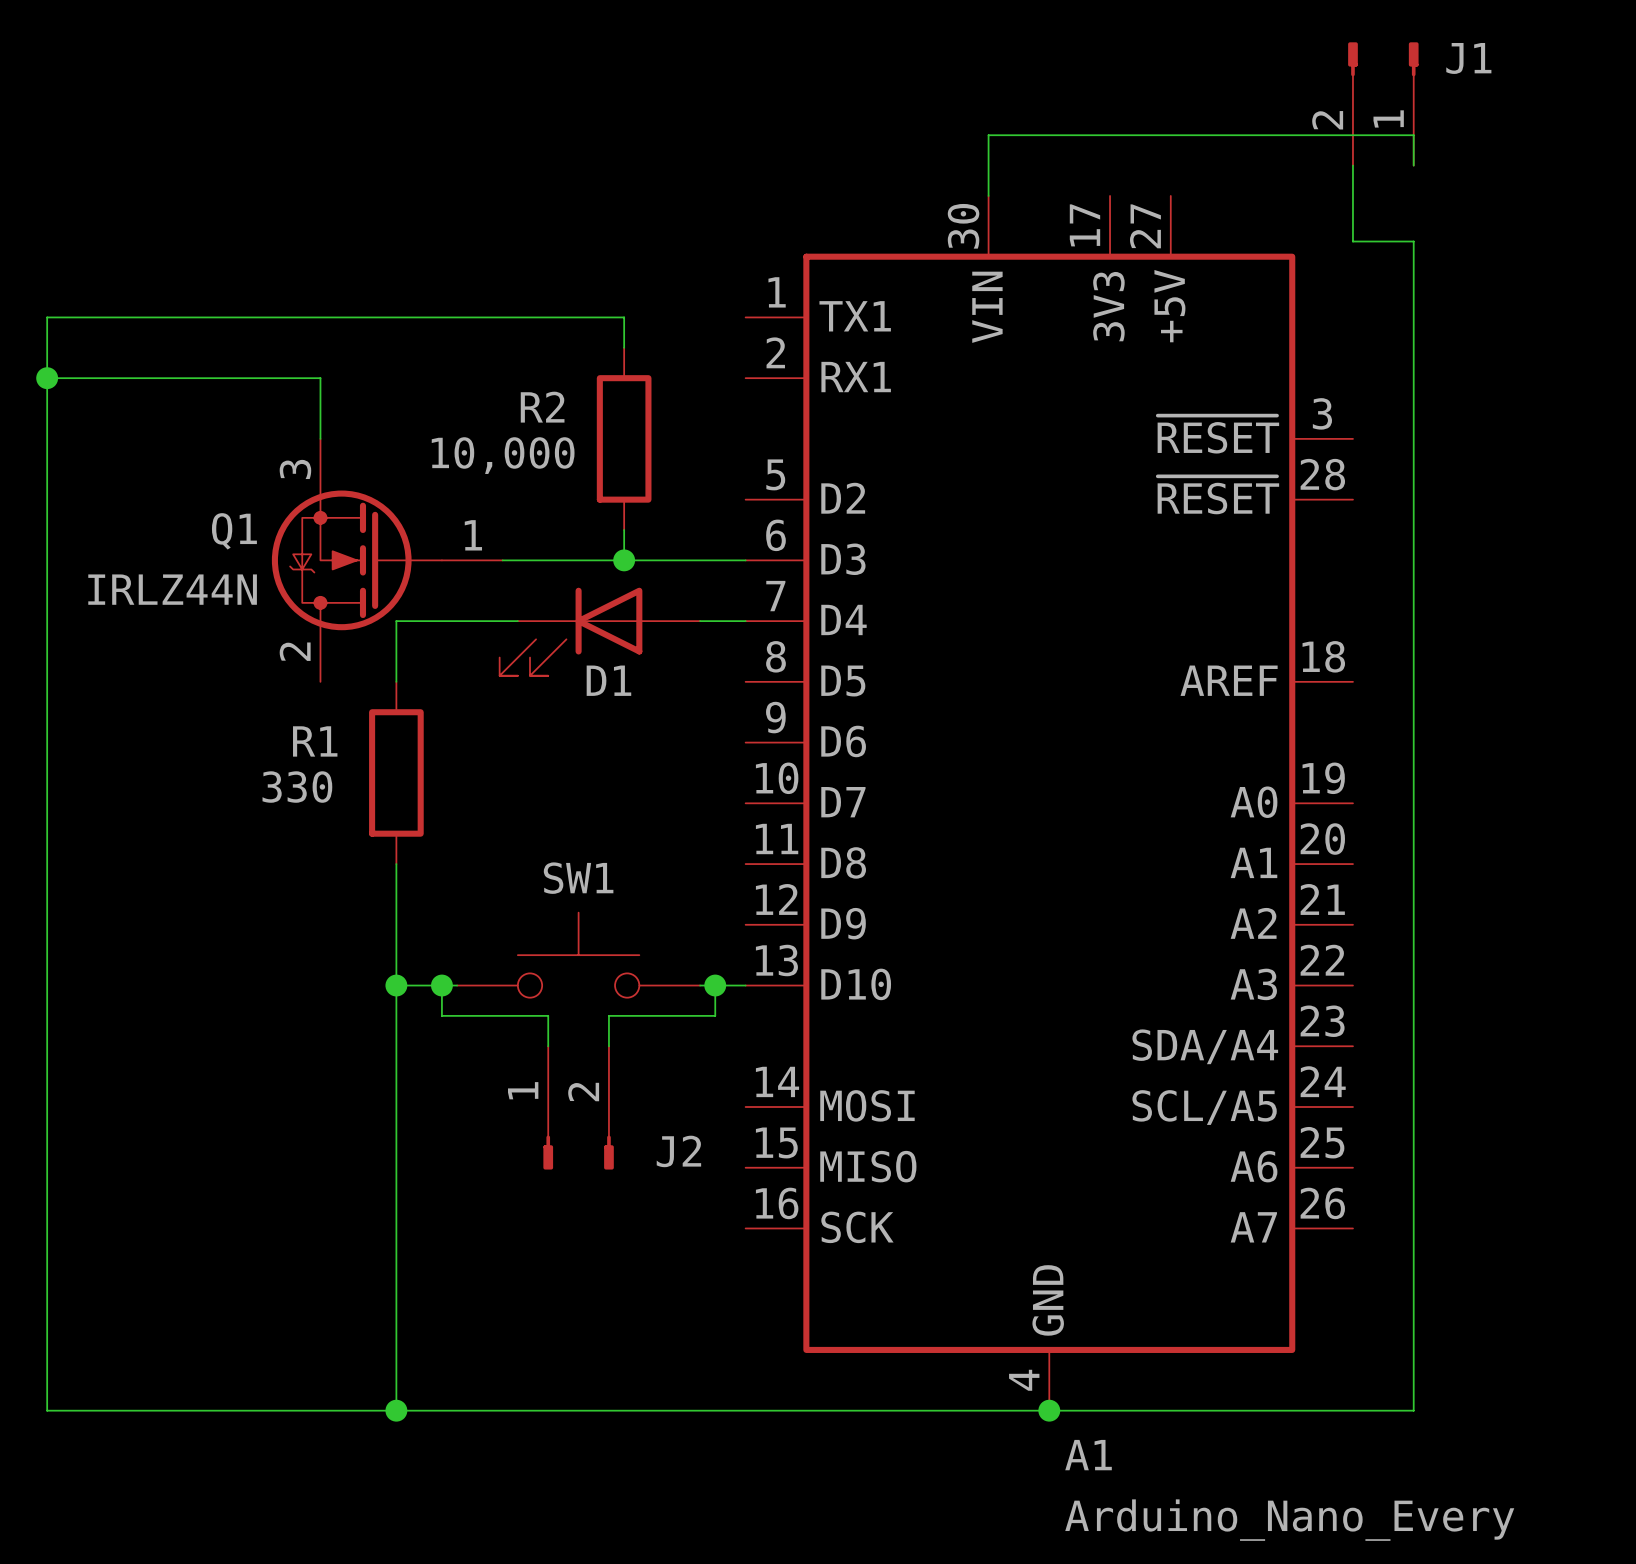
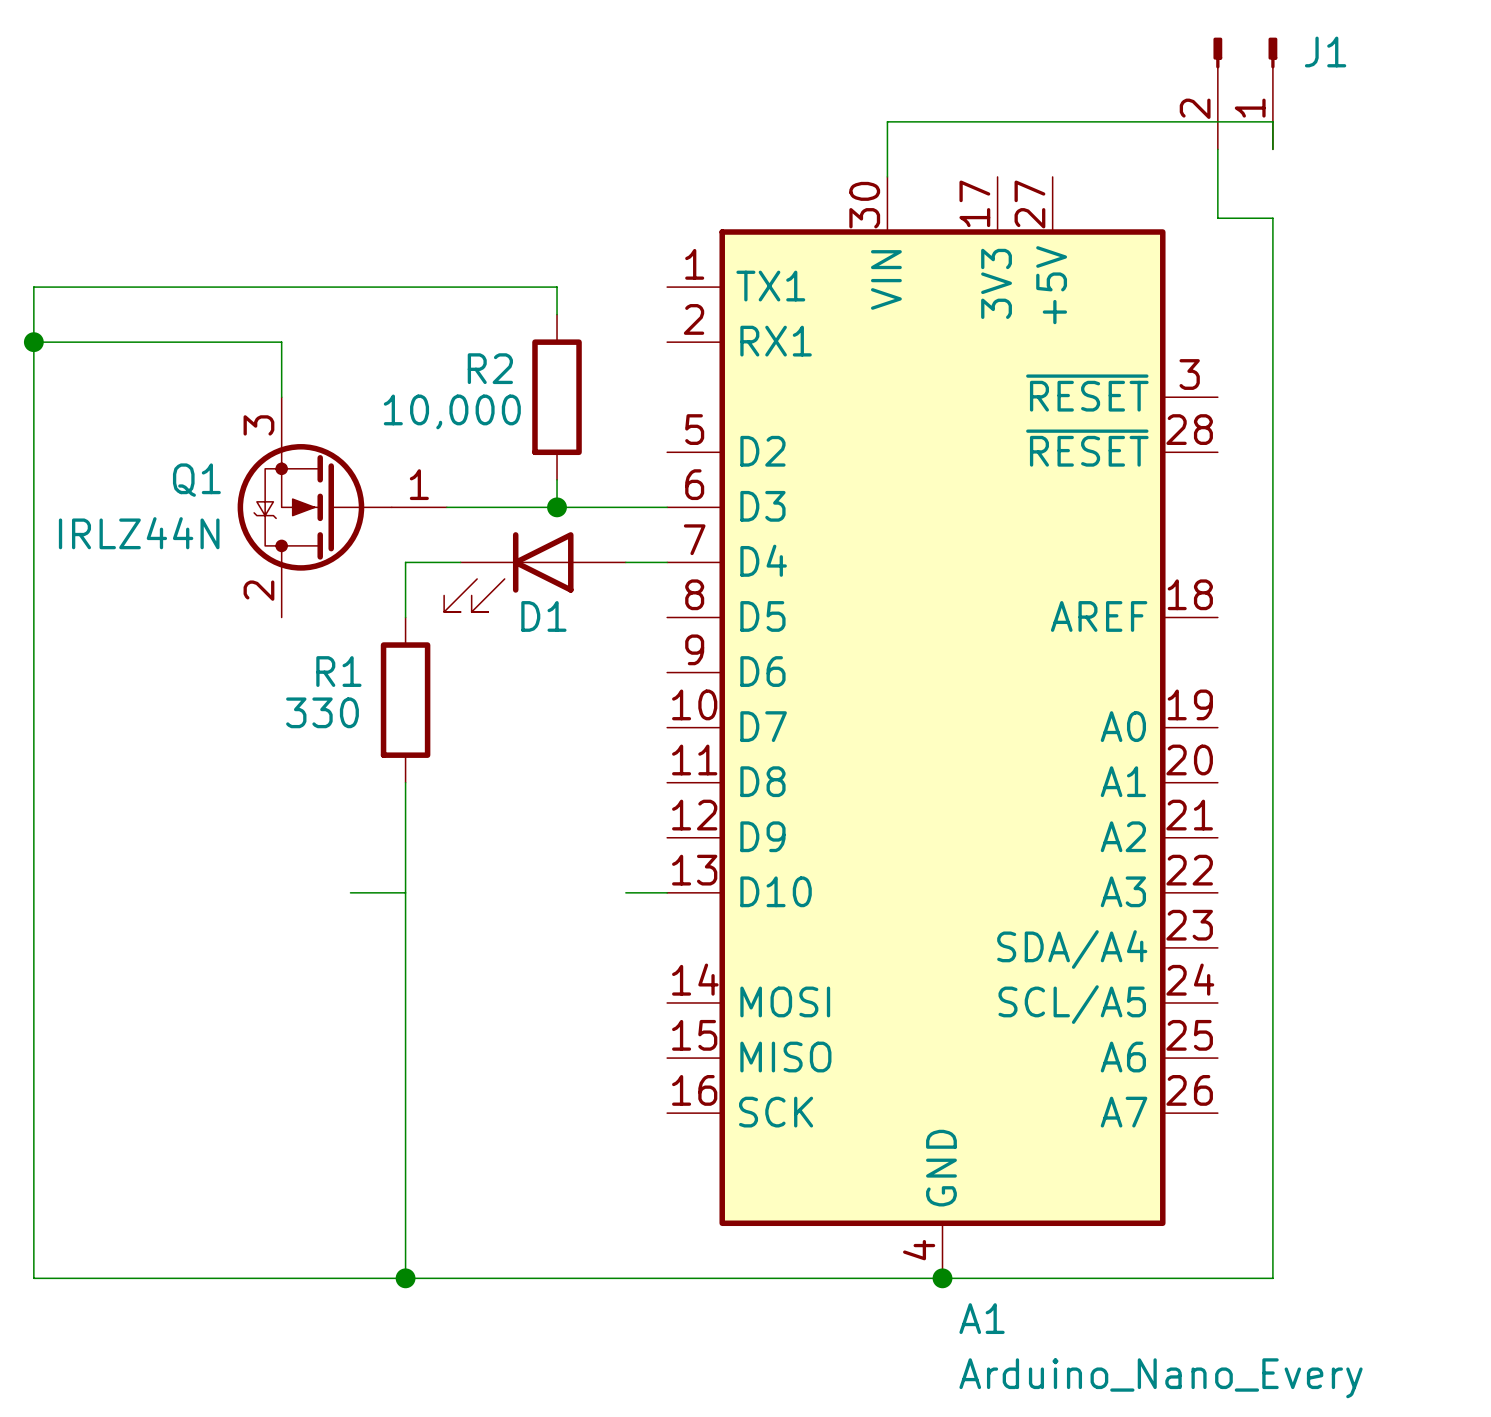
wire: (457, 621) (396, 621) (396, 681) -> (405, 562) (405, 617)
R1 position: (396, 772) -> (405, 700)
wire: (396, 864) (396, 1410) -> (405, 782) (405, 1278)
SW1: (578, 955) -> none
junction: (396, 985) -> none
wire: (441, 985) (441, 1015) (548, 1015) (548, 1046) -> none
junction: (441, 985) -> none
wire: (715, 985) (715, 1015) (608, 1015) (608, 1046) -> none
junction: (715, 985) -> none
J2: (578, 1107) -> none
junction position: (396, 1410) -> (405, 1278)

